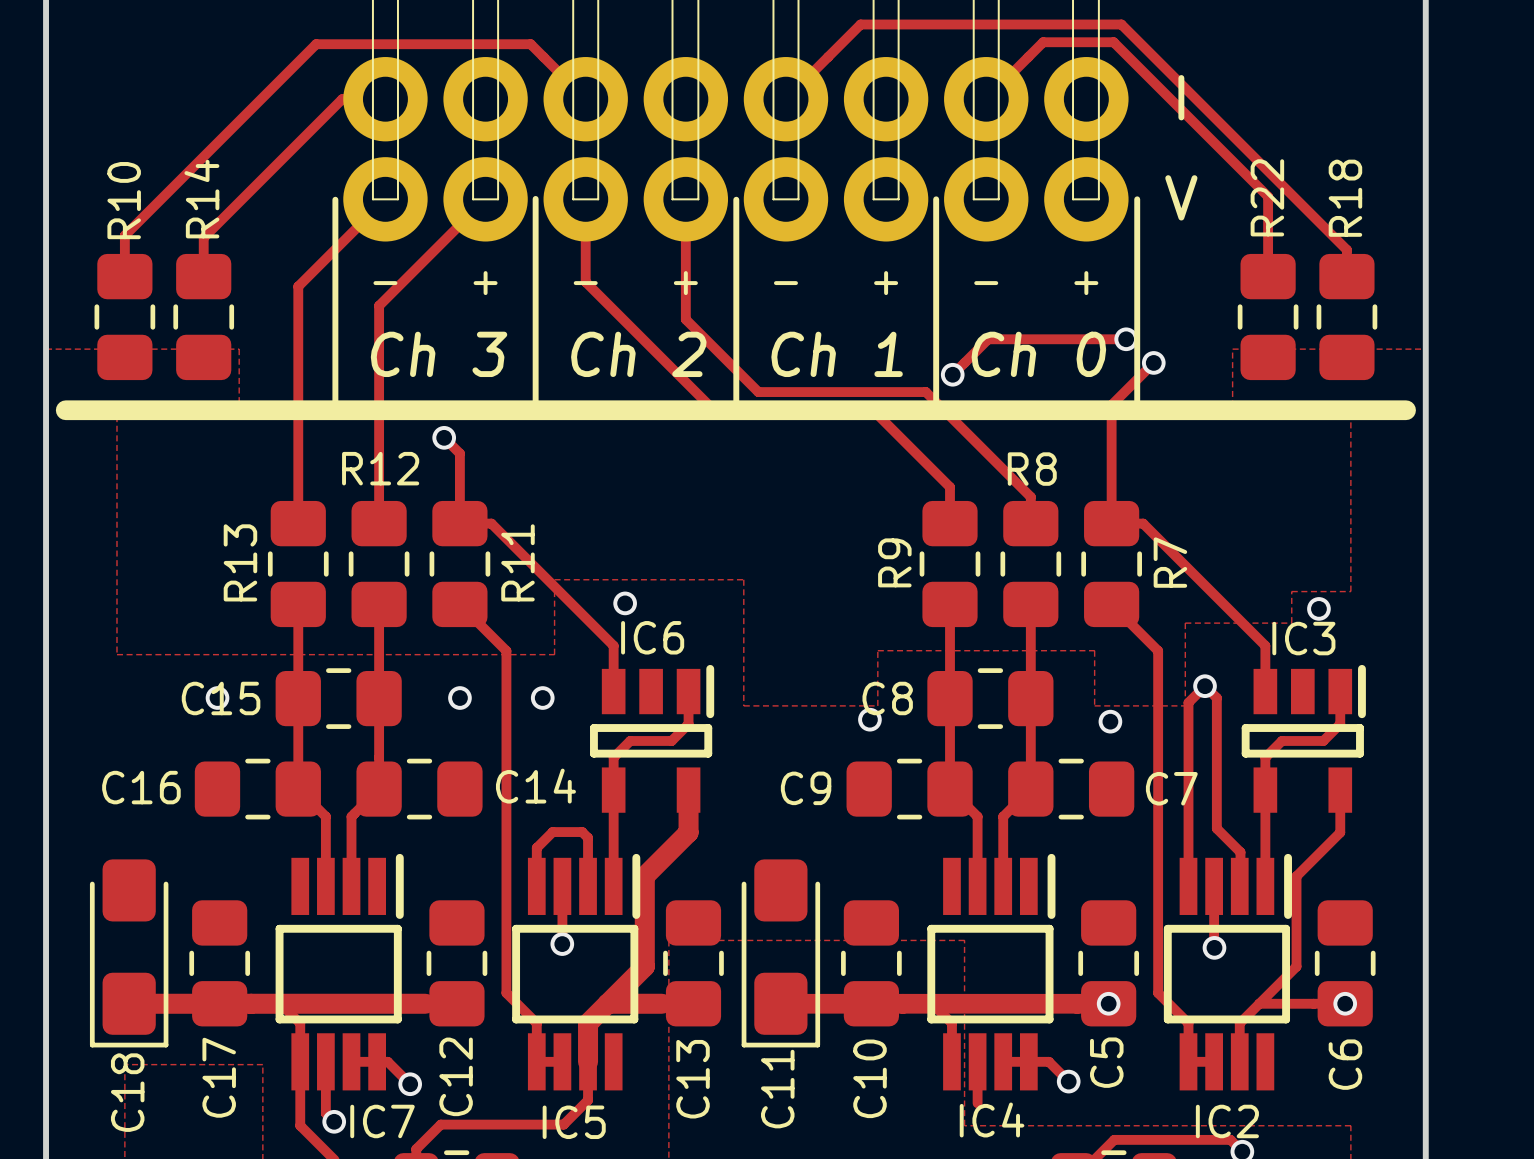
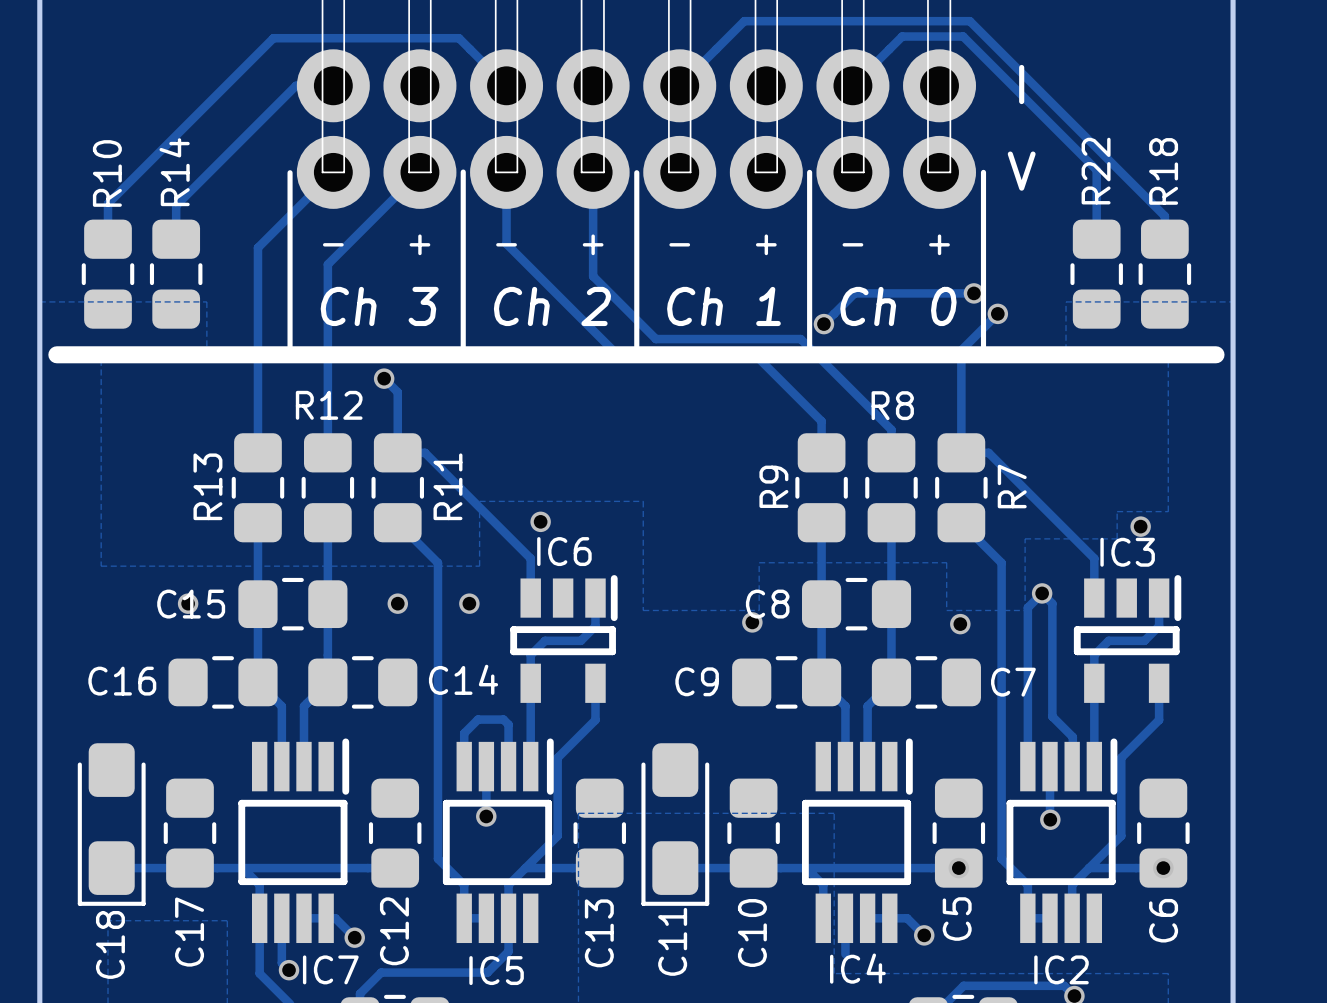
track width: thick (688, 790) (688, 832) (644, 876) (644, 966) (588, 1023) (588, 1061) -> thin (595, 683) (595, 720) (557, 757) (557, 835) (508, 885) (508, 918)
track width: thick (129, 1003) (425, 1003) -> thin (111, 868) (367, 868)
track width: thick (607, 1003) (661, 1003) -> thin (525, 868) (572, 868)
track width: thick (780, 1003) (1108, 1003) -> thin (675, 868) (958, 868)

